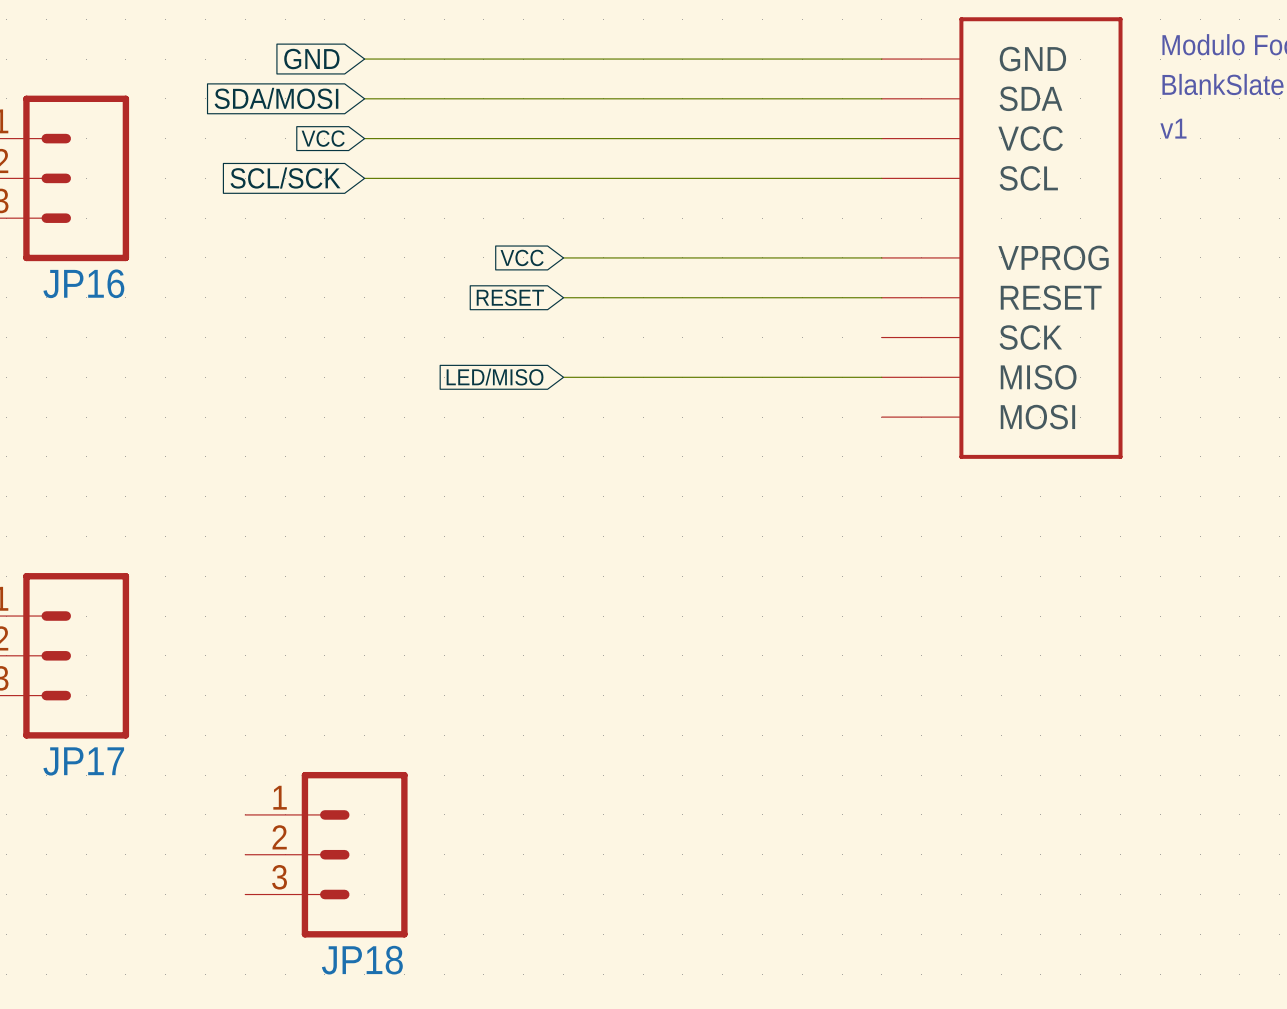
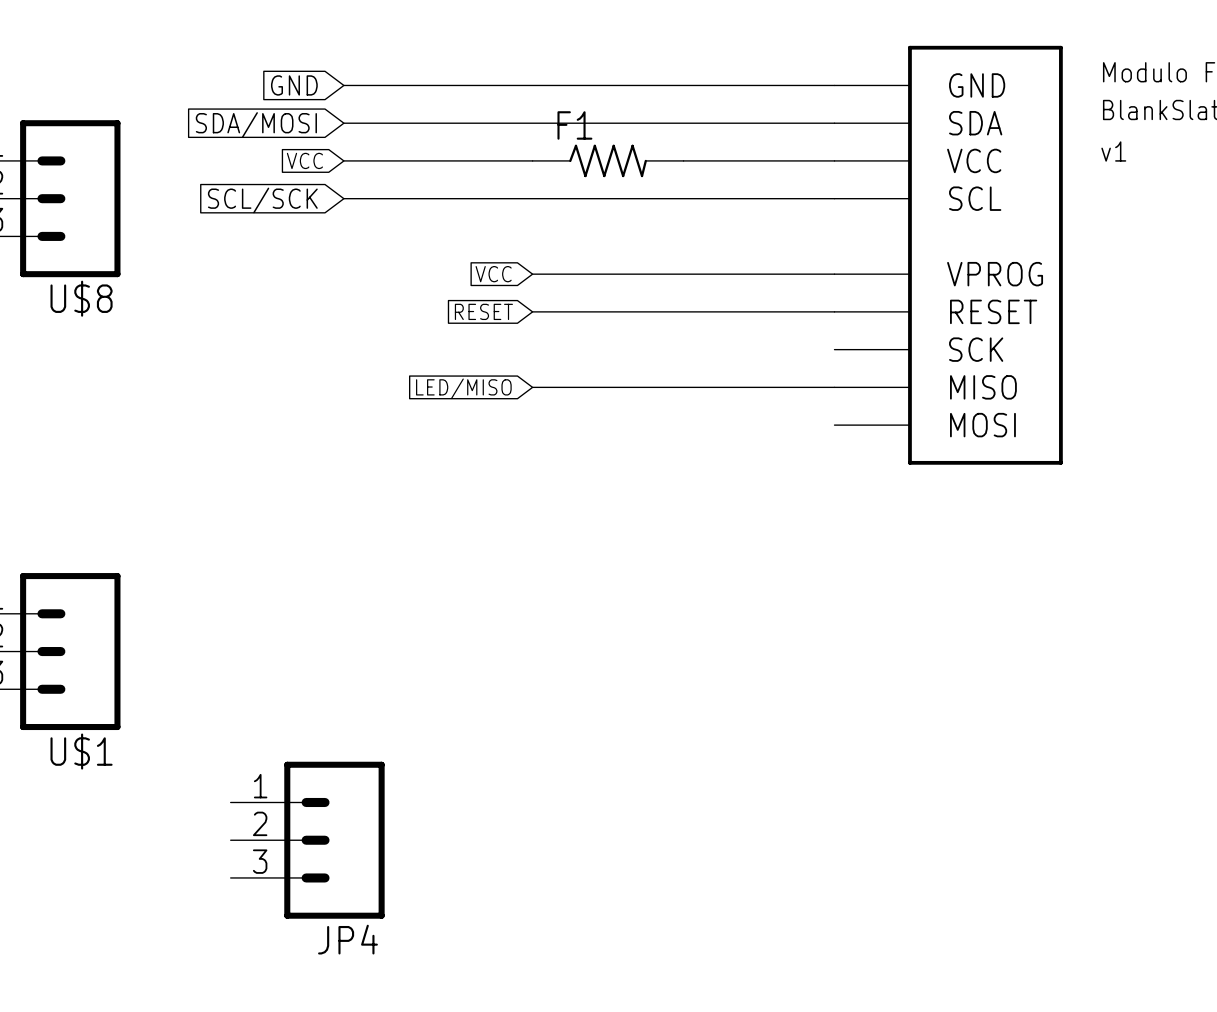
F1: none -> (608, 160)
JP16 name: JP16 (83, 283) -> U$8 (81, 298)
JP17 name: JP17 (83, 761) -> U$1 (81, 751)
JP18 name: JP18 (362, 960) -> JP4 (347, 939)

